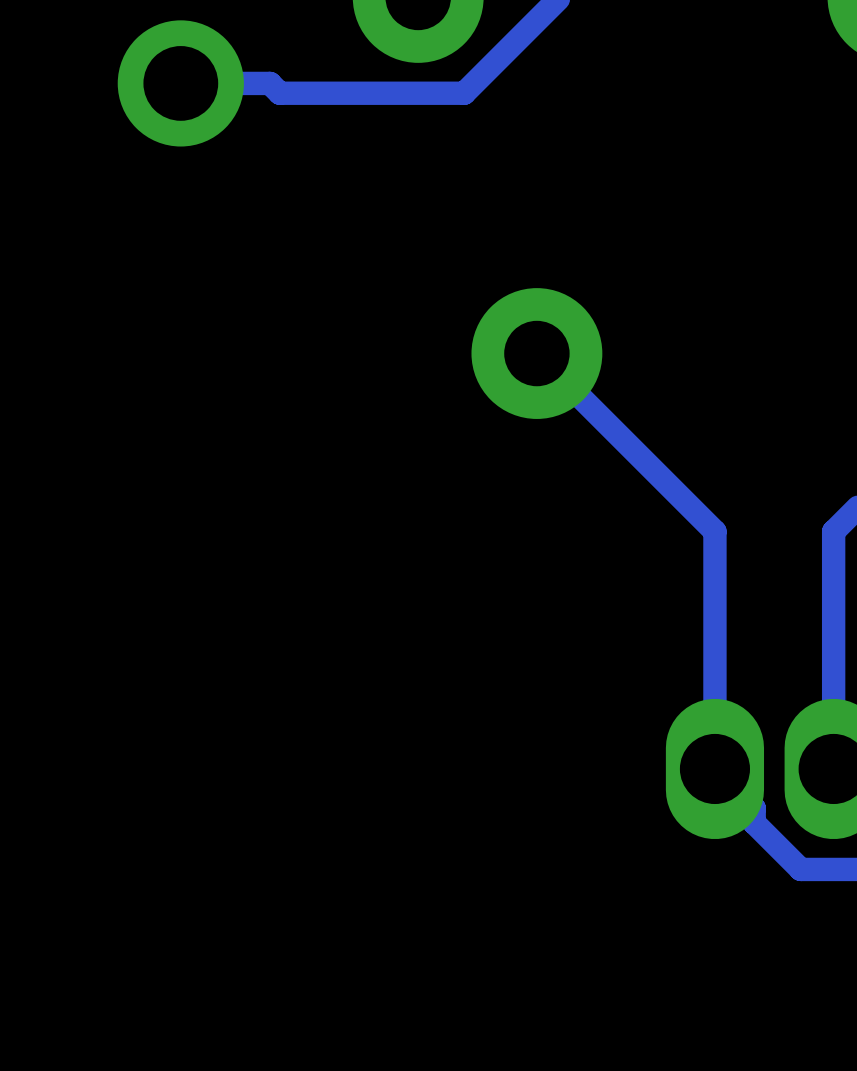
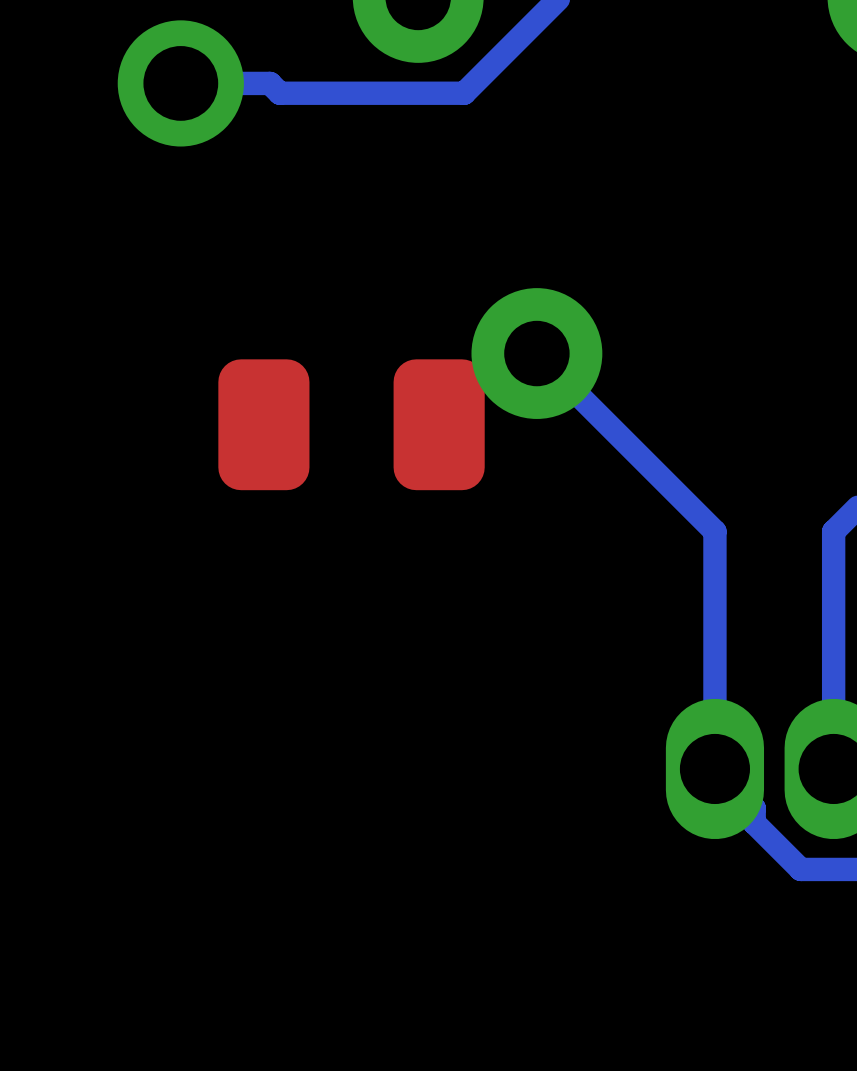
part: none -> (351, 424)

